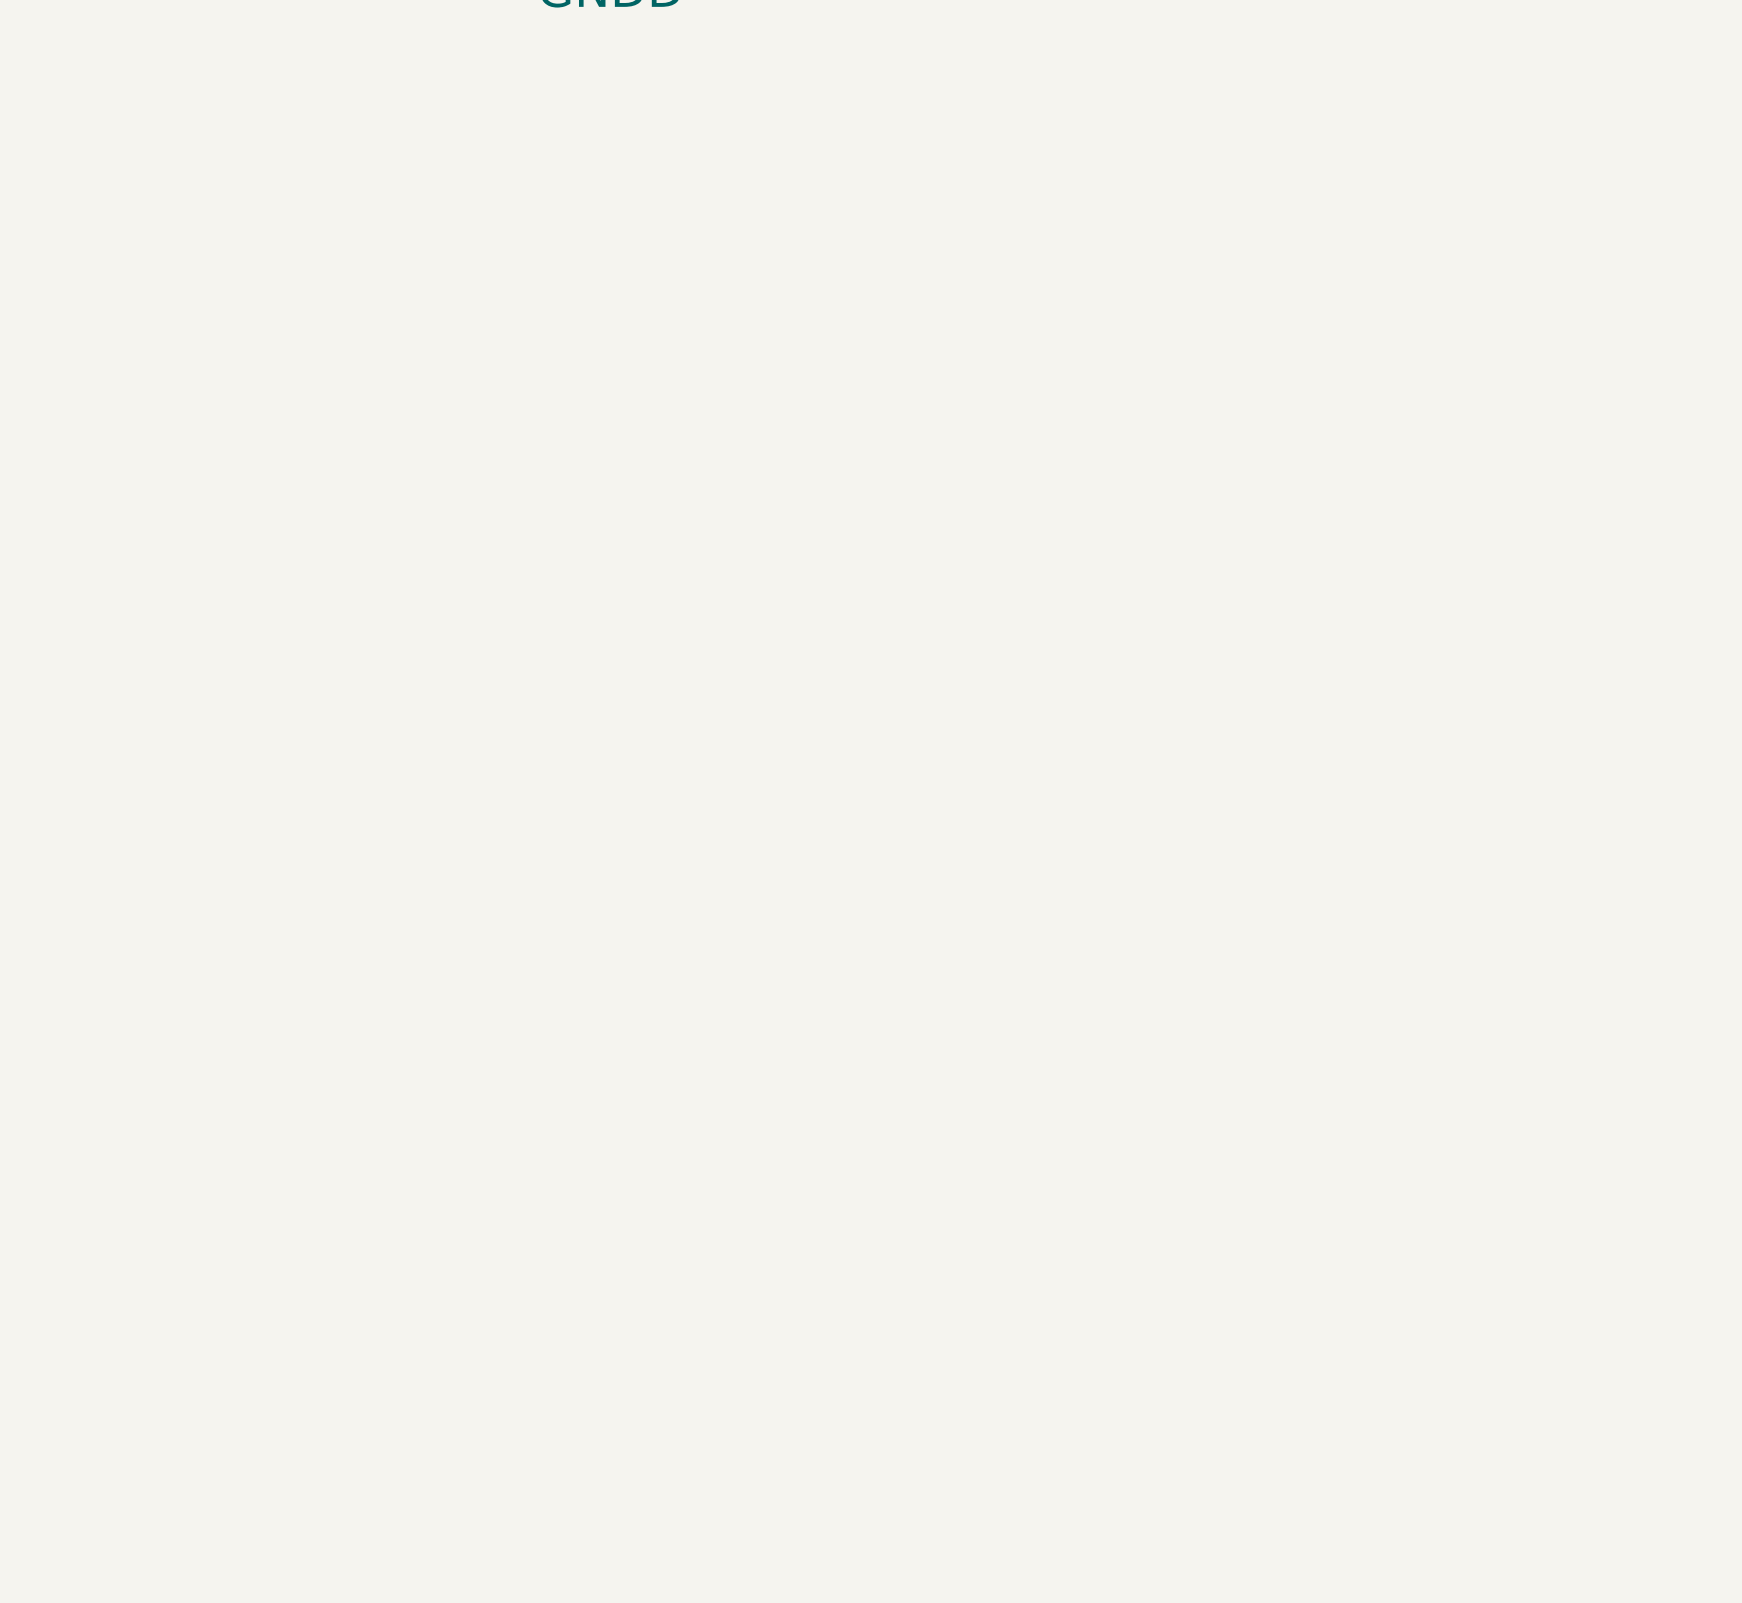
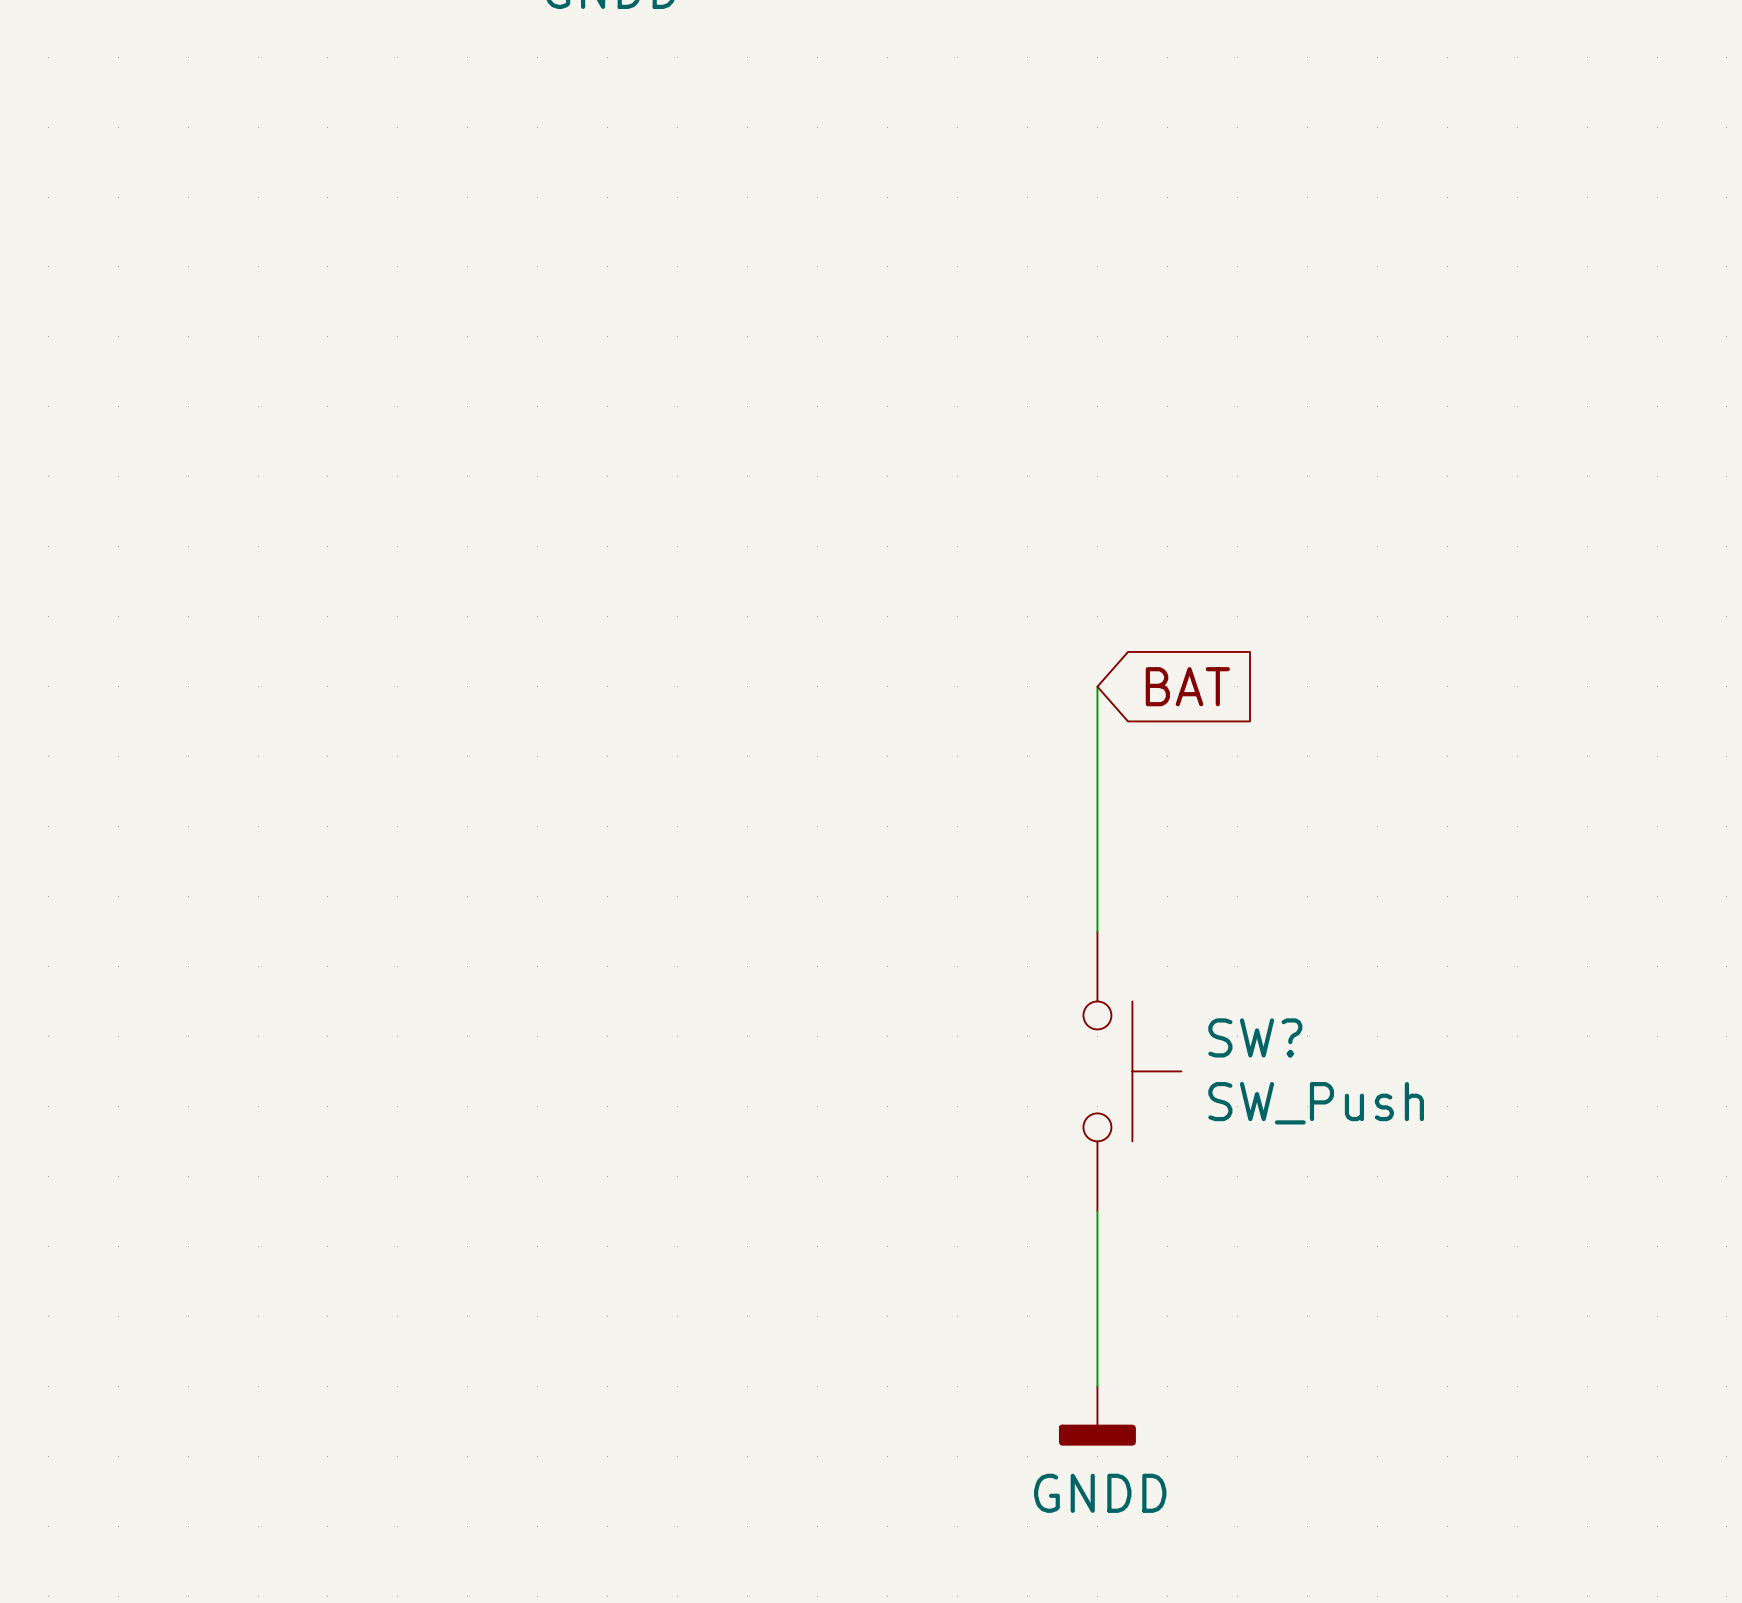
wire: none -> (1097, 686) (1097, 931)
global label: none -> BAT (1187, 686)
SW?: none -> SW_Push (1132, 1071)
wire: none -> (1097, 1211) (1097, 1386)
power symbol: none -> GNDD (1097, 1415)

